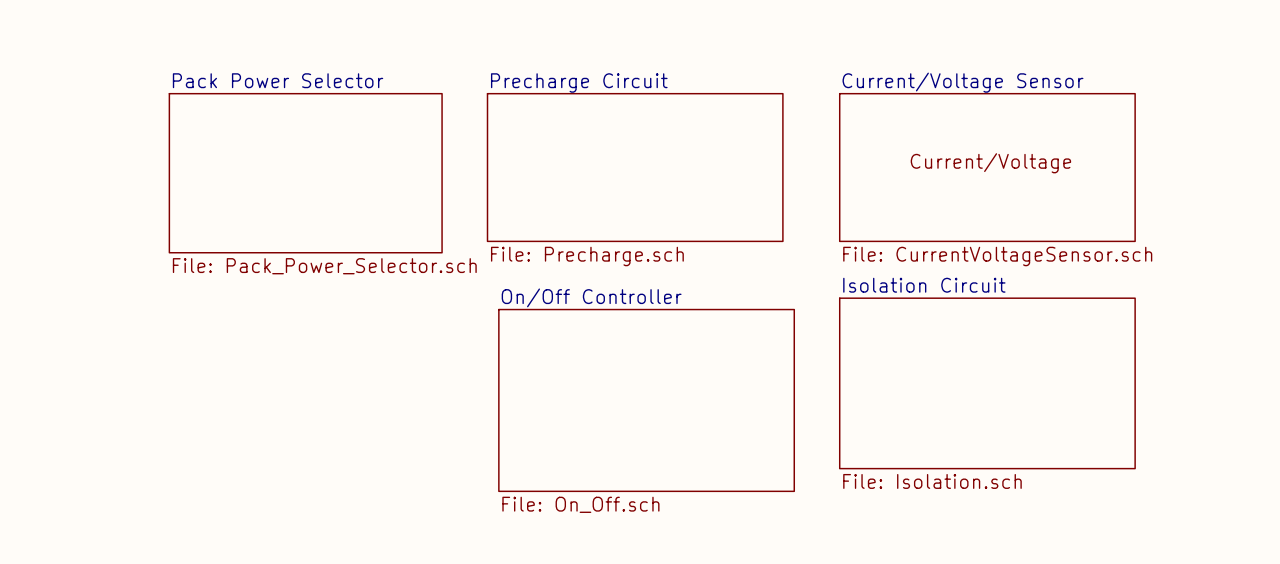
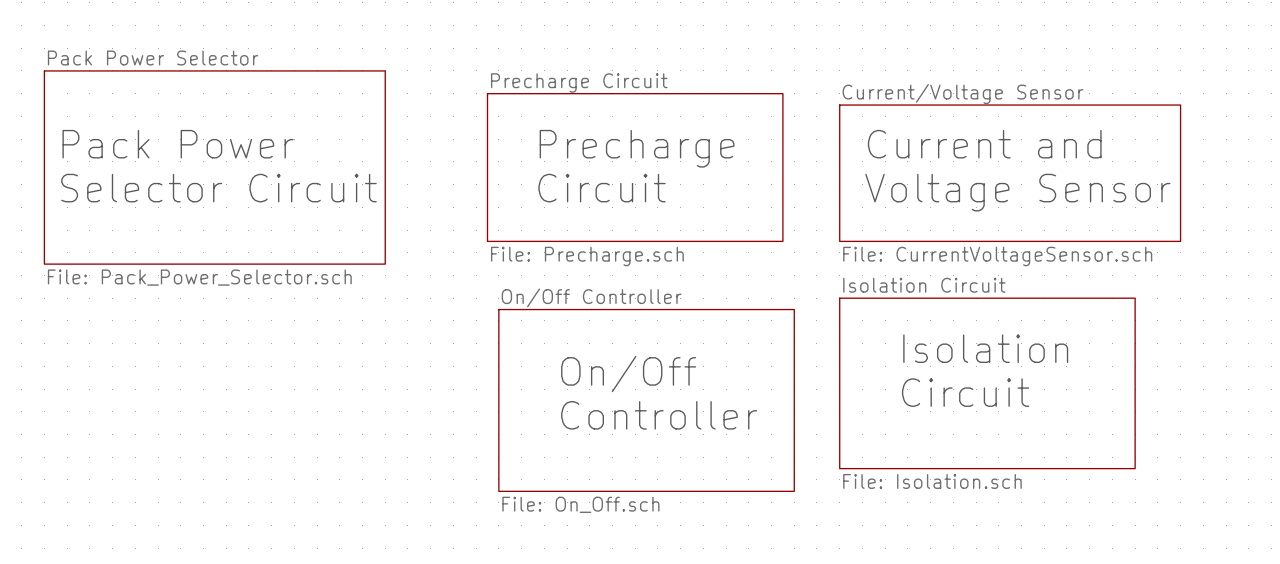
text: none -> Pack Power (178, 144)
text: none -> Current and (984, 144)
text: none -> Precharge (637, 148)
label: Current/Voltage (990, 163) -> none
sheet Pack Power Selector: none -> File: Pack_Power_Selector.sch (214, 167)
sheet Current/Voltage Sensor: File: CurrentVoltageSensor.sch (987, 167) -> none
sheet Pack Power Selector: File: Pack_Power_Selector.sch (305, 173) -> none
sheet Current/Voltage Sensor: none -> File: CurrentVoltageSensor.sch (1010, 173)
text: none -> Selector Circuit (218, 188)
text: none -> Circuit (602, 188)
text: none -> Voltage Sensor (1017, 192)
text: none -> Isolation (985, 348)
text: none -> On/Off (628, 374)
text: none -> Circuit (965, 392)
text: none -> Controller (659, 415)

